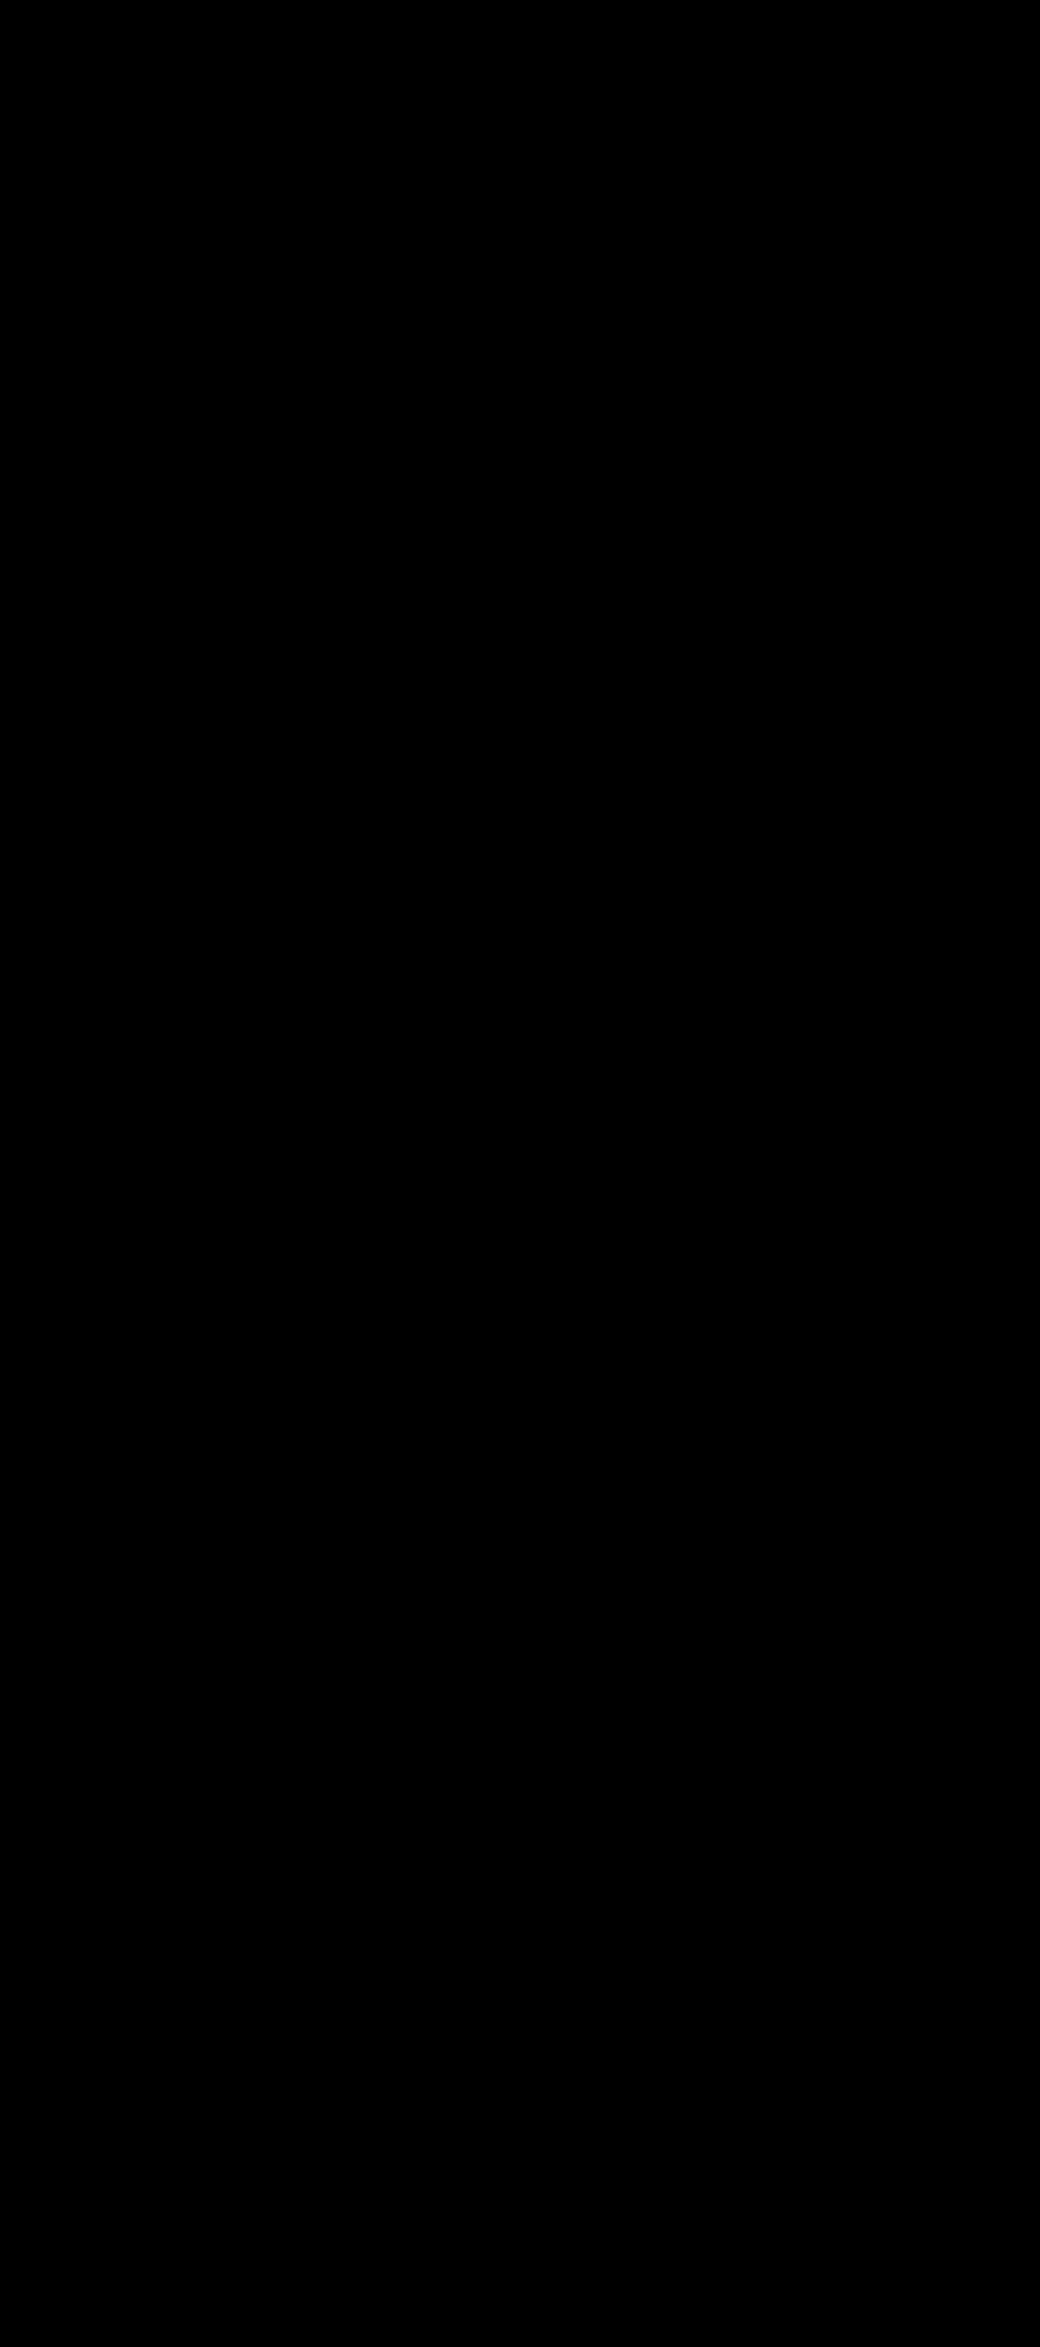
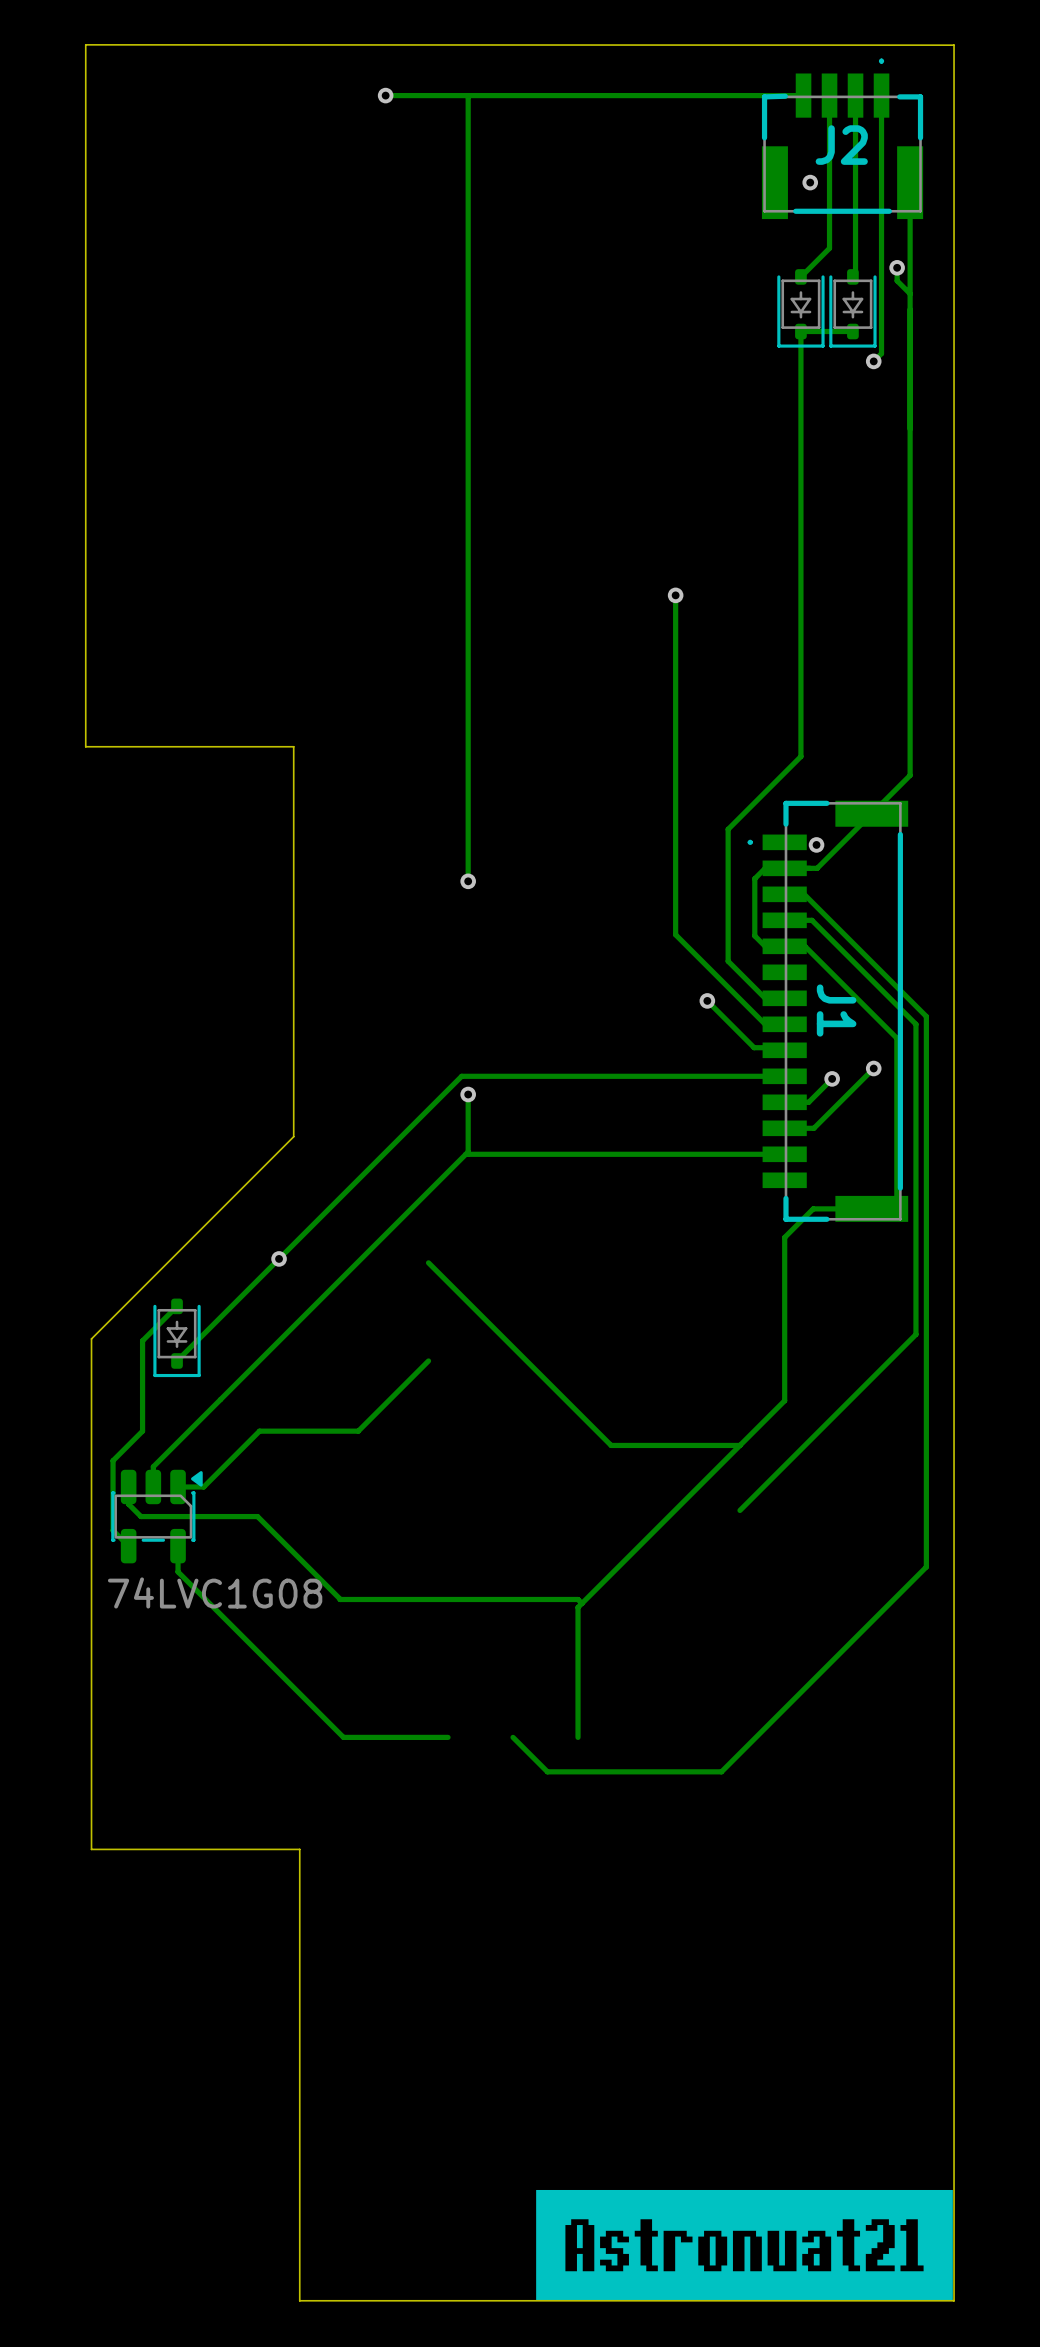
board edge: none -> (85, 44) (954, 45) (954, 2300) (299, 2300) (299, 1849) (91, 1849) (91, 1338) (293, 1136) (293, 746) (85, 746) (85, 44)
via: none -> (385, 95)
track: none -> (468, 95) (468, 881)
track: none -> (803, 95) (385, 95)
track: none -> (829, 95) (829, 248) (800, 276)
track: none -> (855, 95) (855, 274) (852, 276)
track: none -> (881, 95) (881, 353) (873, 361)
J2: none -> (842, 138)
via: none -> (810, 182)
track: none -> (910, 182) (910, 775) (817, 868) (765, 868) (754, 878) (754, 935) (765, 946) (804, 946) (896, 1038) (896, 1199) (887, 1208) (813, 1208) (784, 1237) (784, 1400) (578, 1607) (578, 1737)
track: none -> (897, 267) (897, 280) (910, 293)
via: none -> (897, 267)
part: none -> (800, 308)
part: none -> (852, 308)
track: none -> (852, 331) (800, 331) (800, 756) (728, 829) (728, 961) (765, 998) (784, 998)
via: none -> (873, 361)
track: none -> (675, 595) (675, 934) (765, 1024) (784, 1024)
via: none -> (675, 595)
via: none -> (816, 844)
via: none -> (468, 881)
track: none -> (804, 894) (926, 1016) (926, 1566) (721, 1771) (547, 1771) (513, 1737)
track: none -> (784, 920) (811, 920) (915, 1024) (915, 1334) (739, 1510)
track: none -> (707, 1000) (754, 1047) (782, 1047) (784, 1050)
via: none -> (707, 1000)
J1: none -> (827, 1011)
track: none -> (873, 1068) (813, 1128) (784, 1128)
via: none -> (873, 1068)
track: none -> (784, 1076) (461, 1076) (177, 1360)
track: none -> (832, 1078) (808, 1102) (784, 1102)
via: none -> (832, 1078)
track: none -> (468, 1094) (468, 1151) (153, 1466) (153, 1486)
via: none -> (468, 1094)
track: none -> (784, 1154) (465, 1154)
via: none -> (279, 1258)
track: none -> (428, 1262) (611, 1445) (739, 1445)
track: none -> (177, 1306) (142, 1340) (142, 1431) (113, 1460) (113, 1530) (128, 1546)
part: none -> (177, 1337)
track: none -> (428, 1360) (358, 1431) (259, 1431) (203, 1486) (178, 1486)
track: none -> (128, 1486) (128, 1504) (140, 1516) (257, 1516) (340, 1599)
part: none -> 74LVC1G08 (156, 1516)
track: none -> (178, 1546) (178, 1571) (343, 1737) (448, 1737)
track: none -> (339, 1599) (578, 1599) (581, 1603)
drawing: none -> [536, 2189, 953, 2301]

